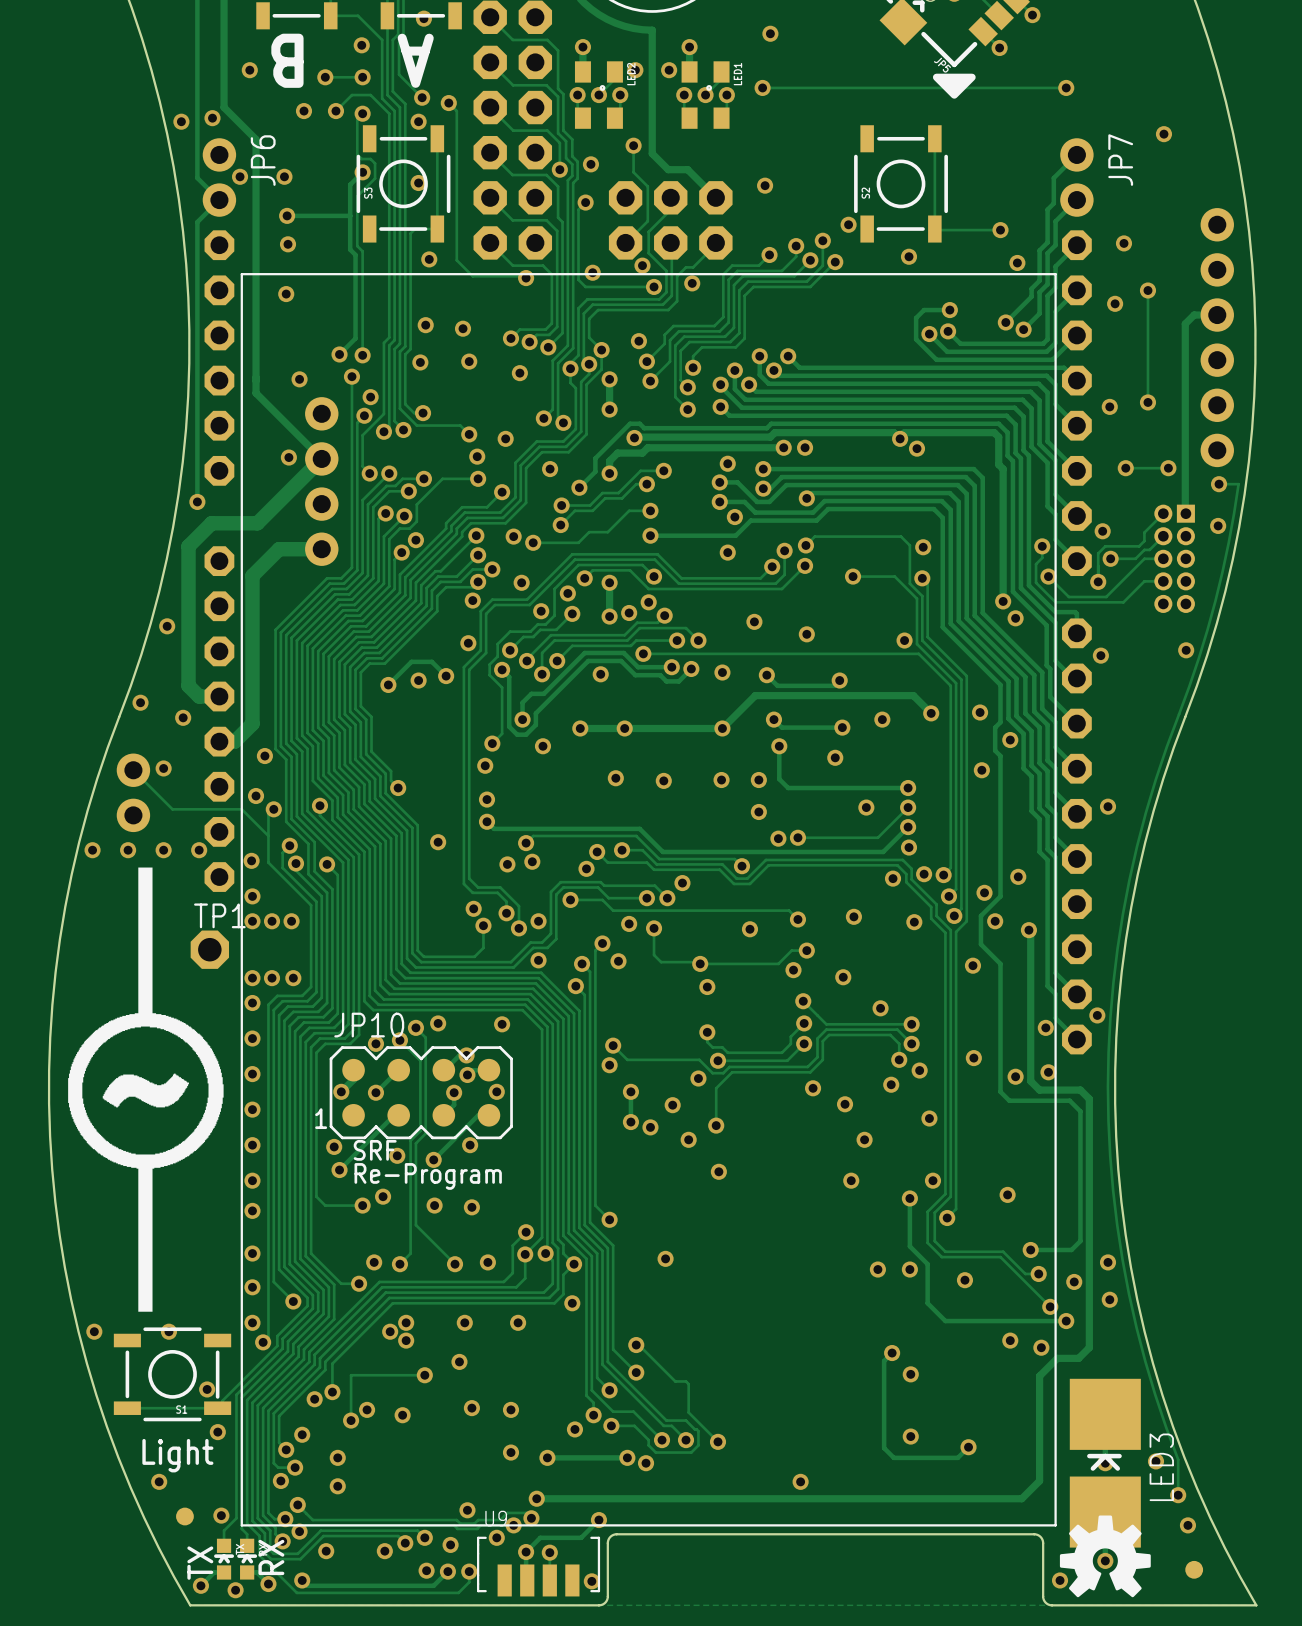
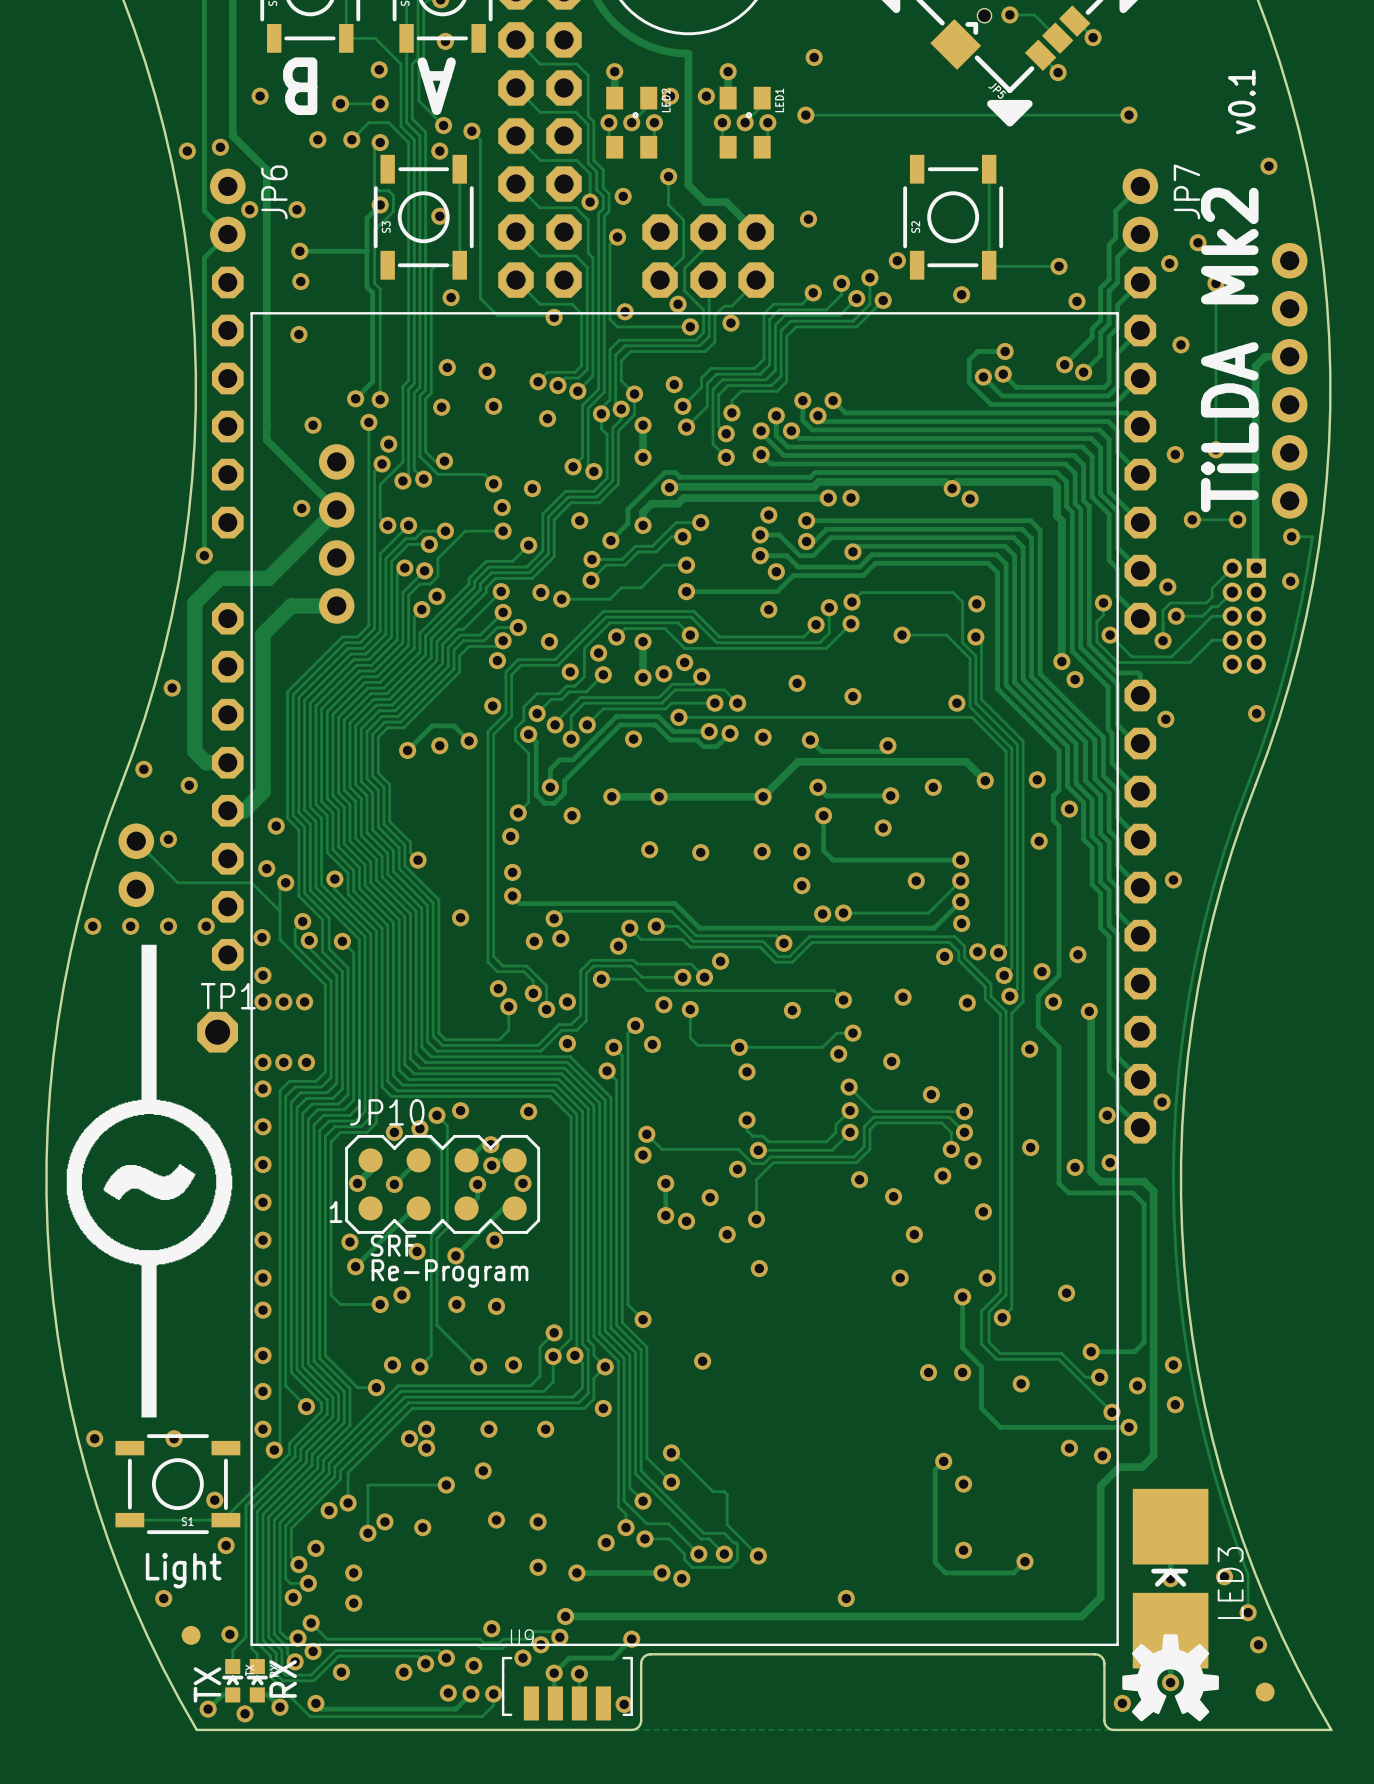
text: none -> v0.1 (1241, 102)
via position: (1163, 134) -> (1268, 166)
via: none -> (1198, 242)
via: none -> (1169, 263)
via: (1123, 243) -> none
track: none -> (1215, 283) (1215, 330)
via: none -> (1215, 283)
via: (1147, 290) -> none
text: none -> TiLDA Mk2 (1229, 349)

